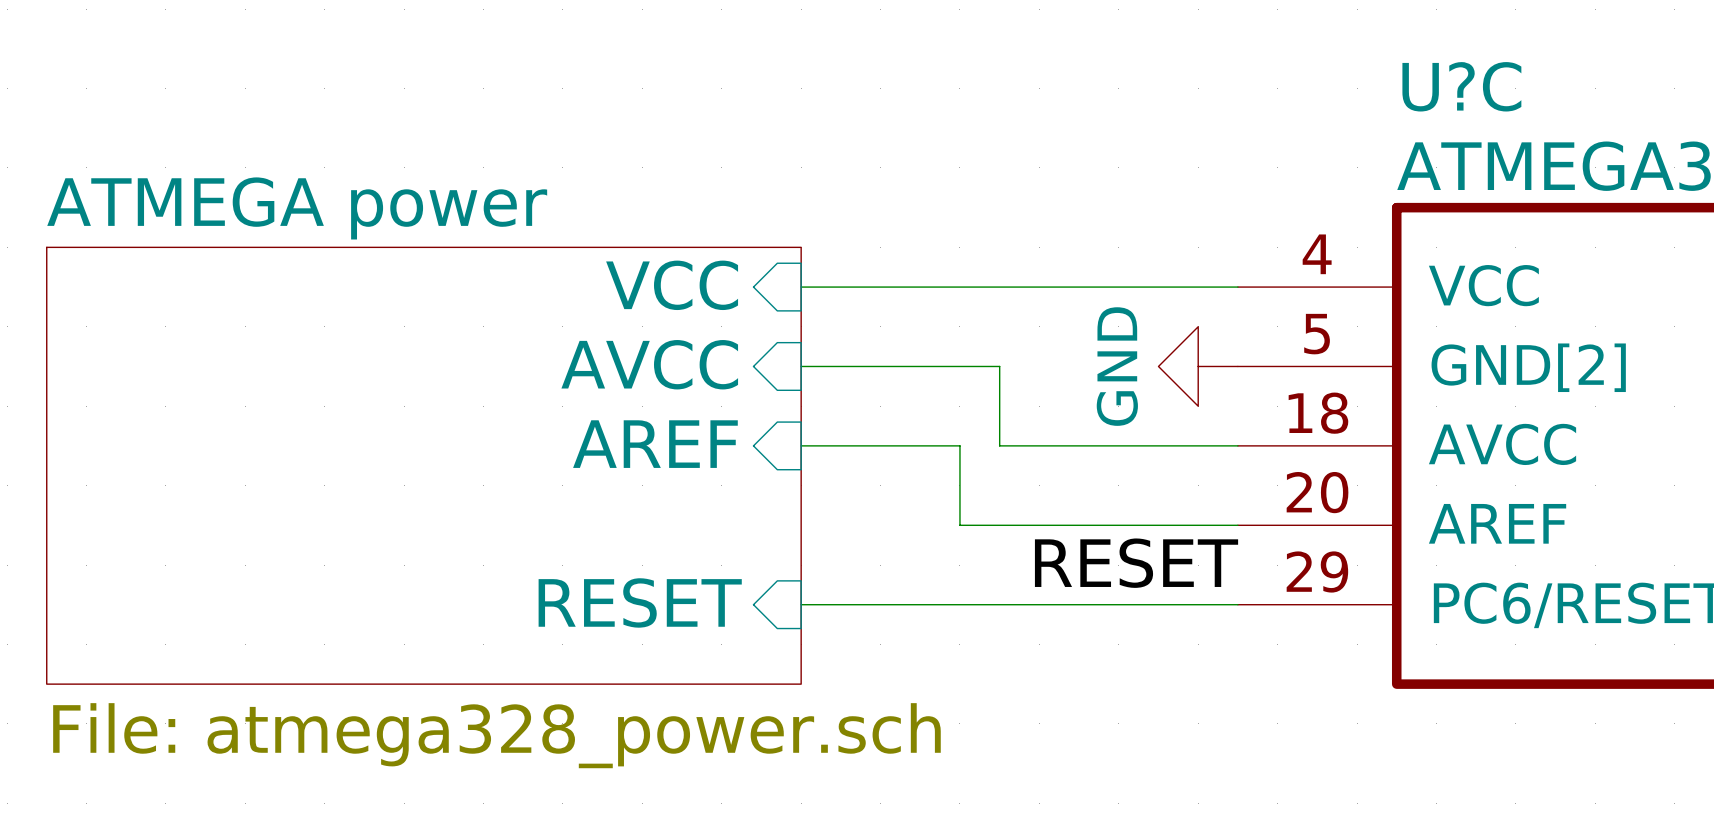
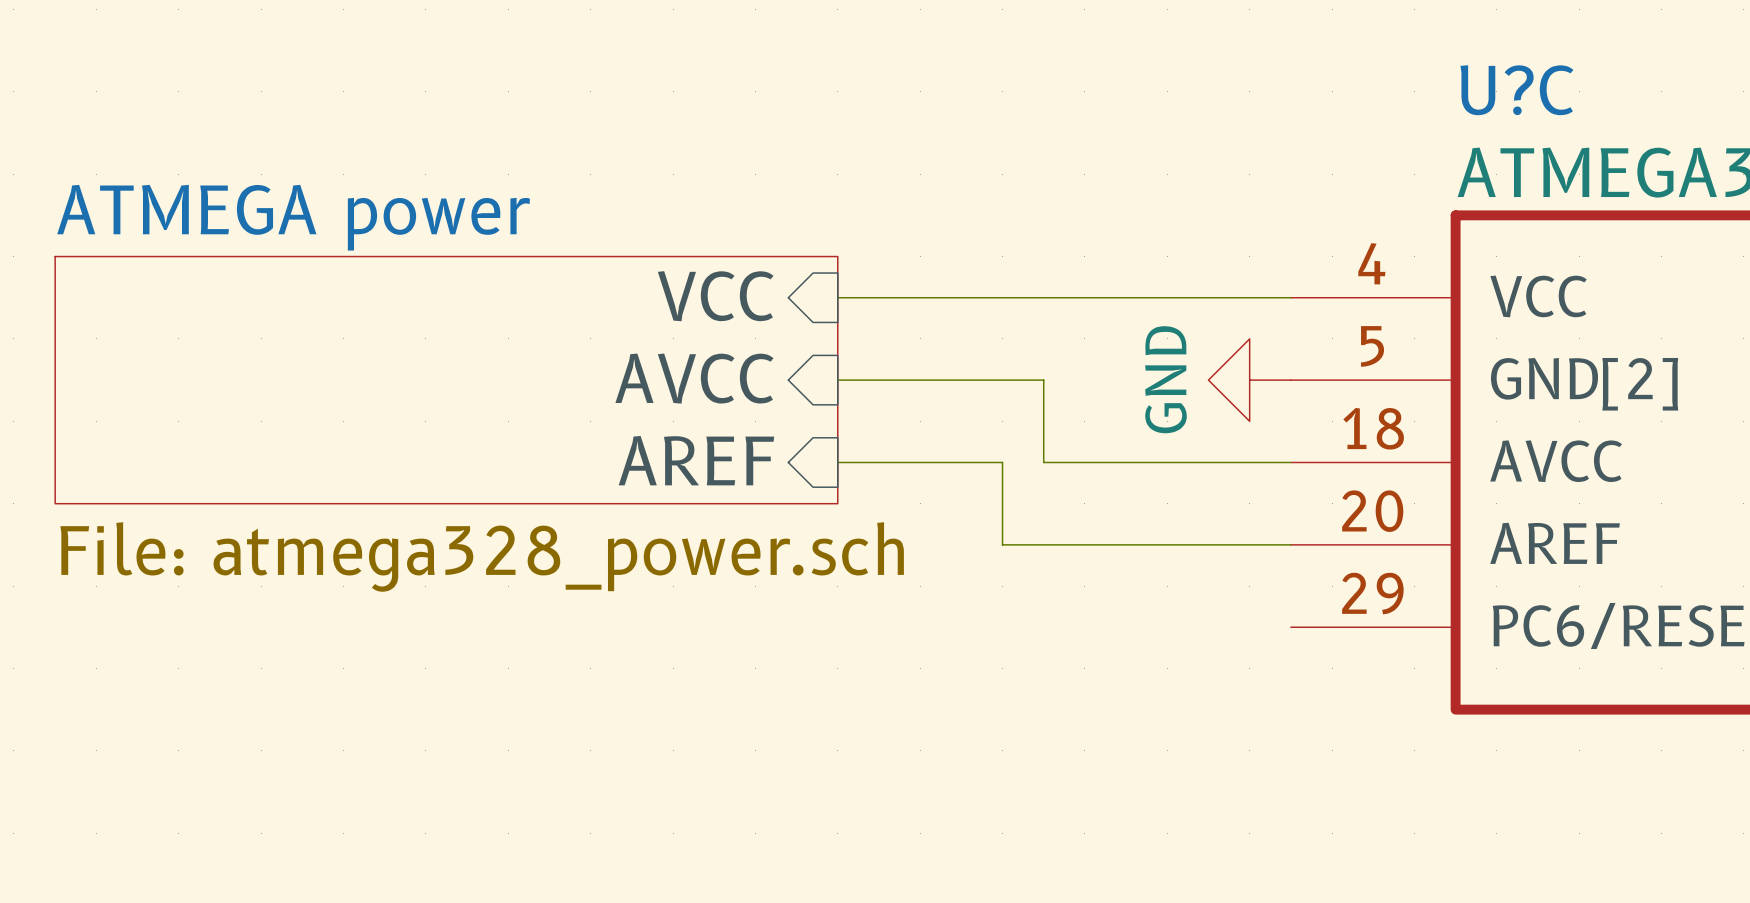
sheet ATMEGA power: none -> File: atmega328_power.sch (446, 380)
sheet ATMEGA power: File: atmega328_power.sch (423, 465) -> none
label: RESET (1136, 563) -> none
sheet pin: RESET (640, 602) -> none
wire: (801, 604) (1237, 604) -> none

